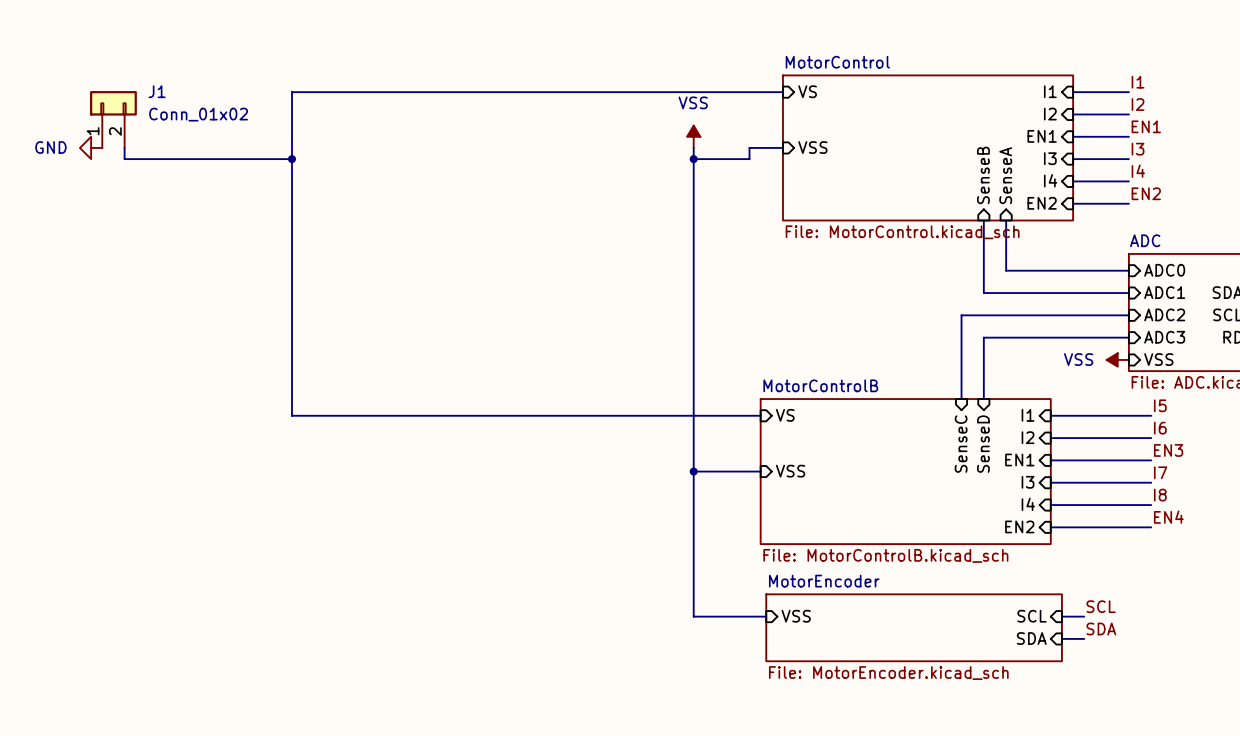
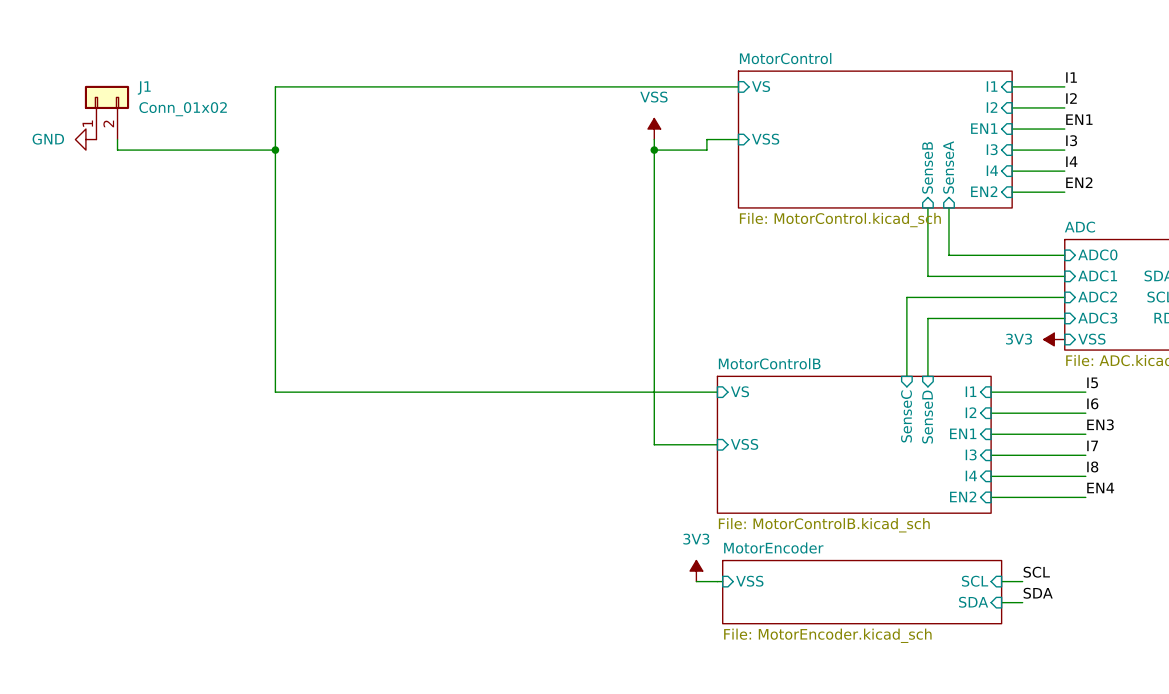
power symbol: VSS (1117, 359) -> 3V3 (1054, 339)
wire: (693, 471) (693, 616) (738, 616) -> none
junction: (693, 471) -> none
power symbol: none -> 3V3 (696, 571)

